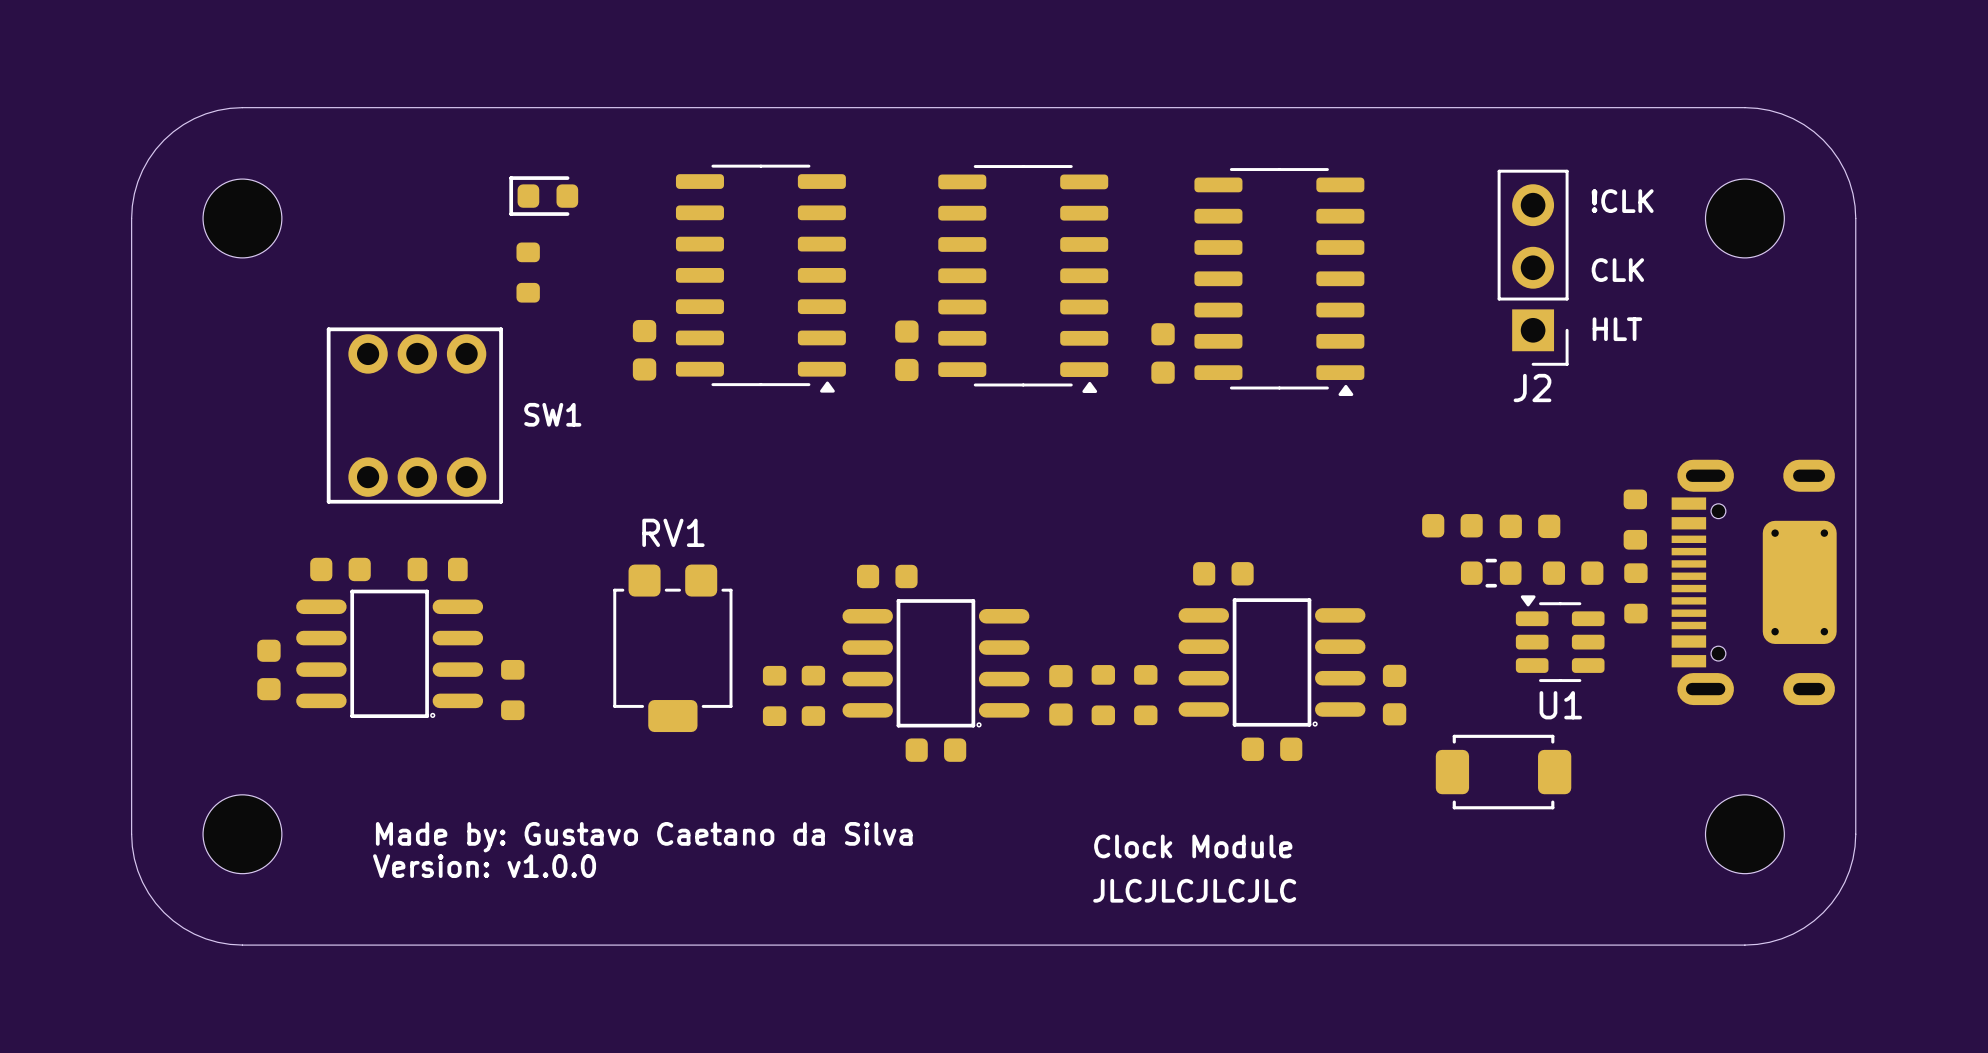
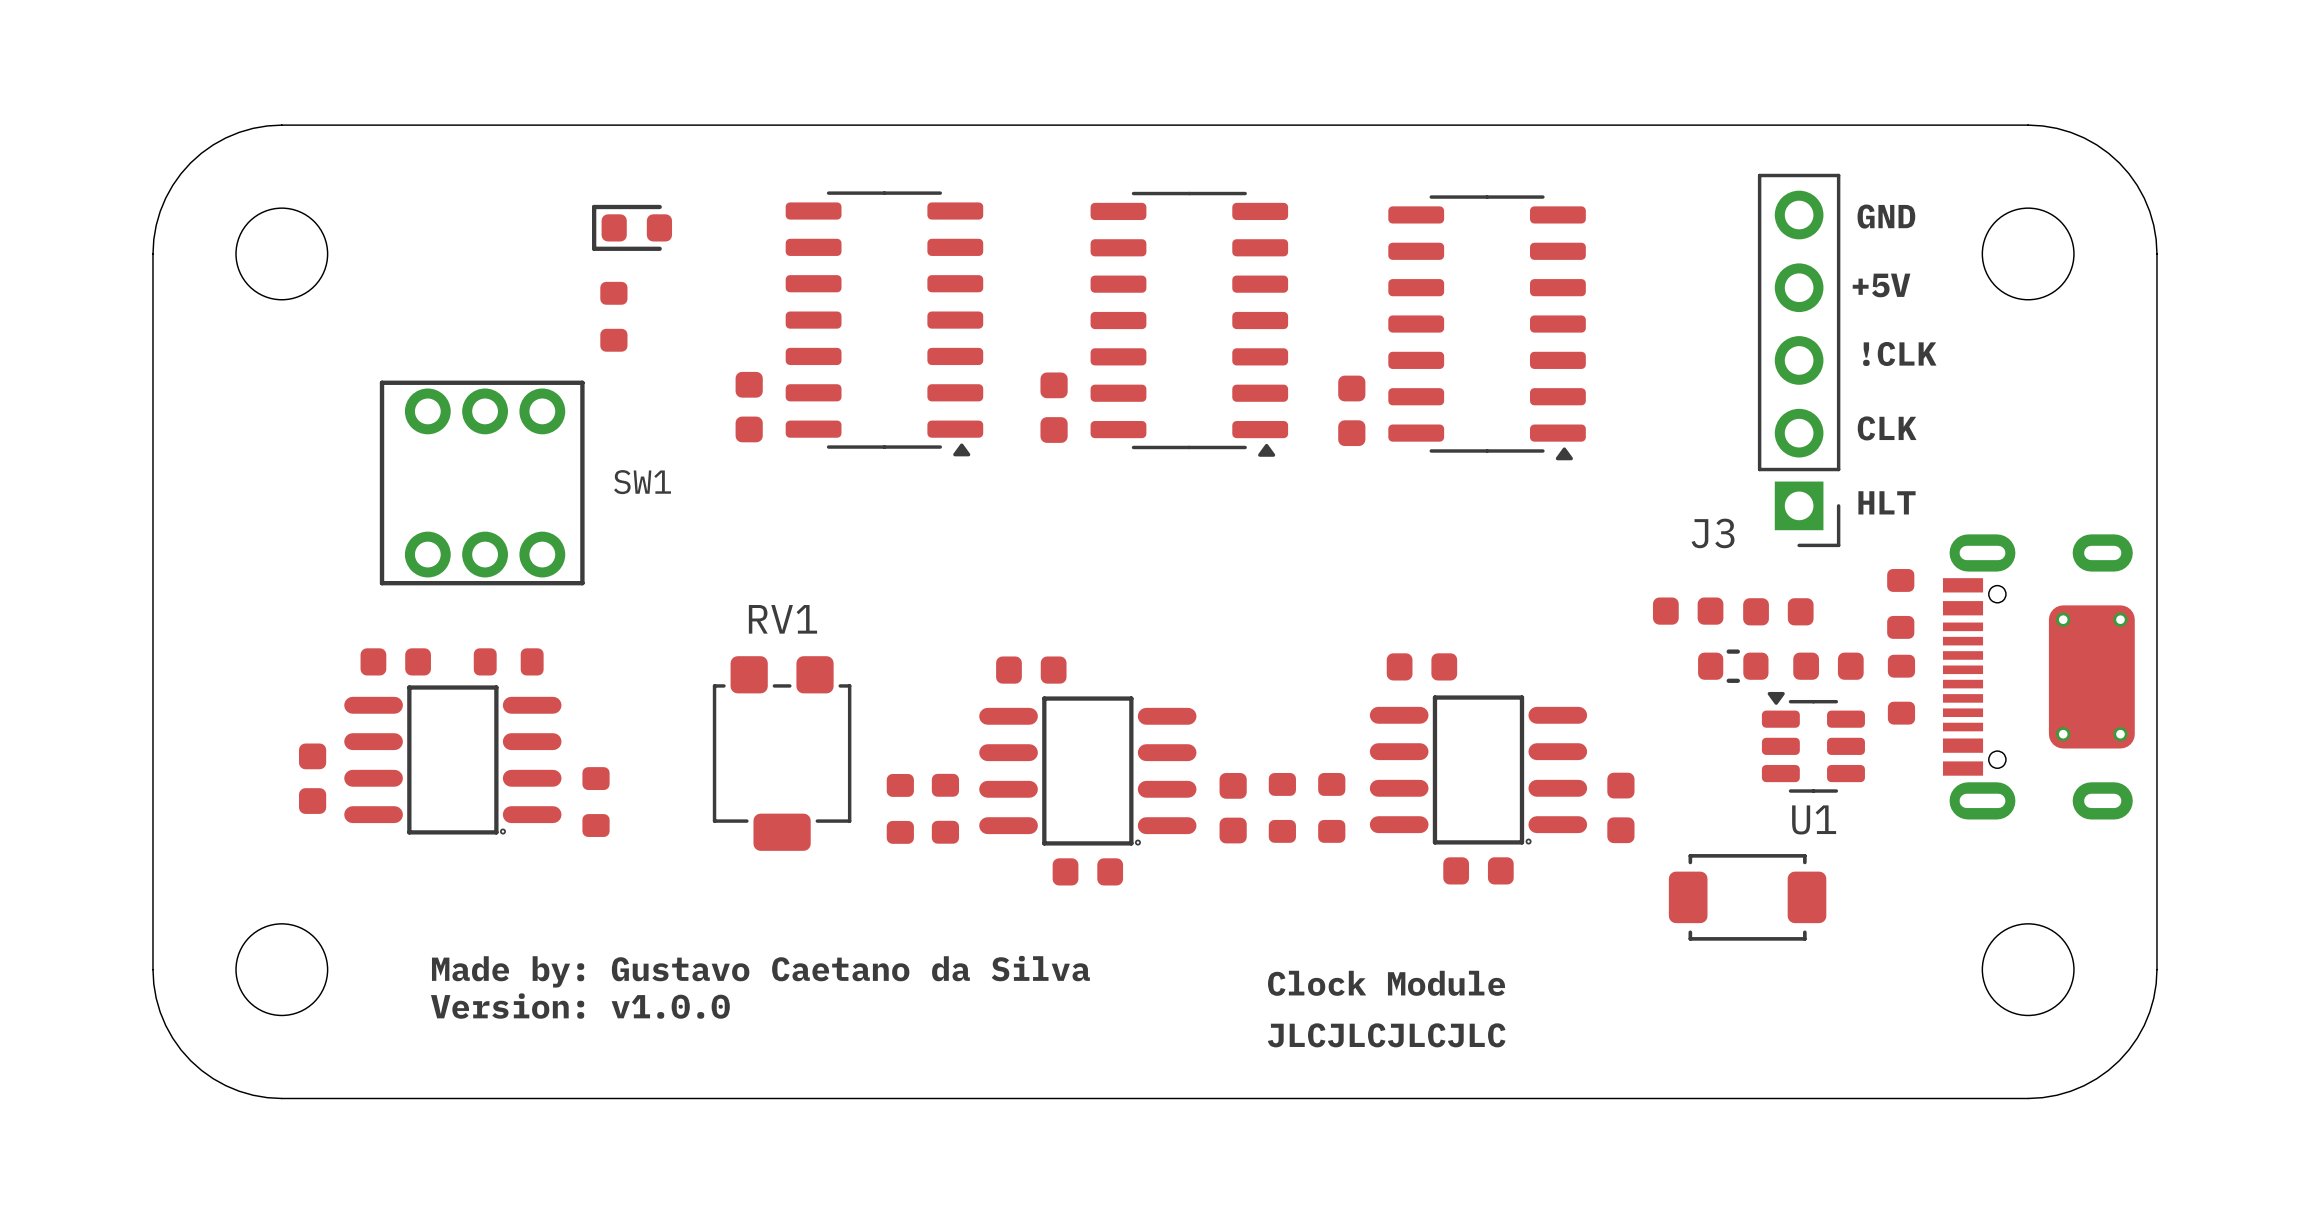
text: !CLK (1622, 201) -> GND (1886, 216)
text: none -> +5V (1881, 285)
J2: (1533, 267) -> none
text position: CLK (1617, 270) -> CLK (1887, 428)
text: none -> !CLK (1899, 353)
J3: none -> (1799, 360)
text position: HLT (1617, 329) -> HLT (1887, 502)

